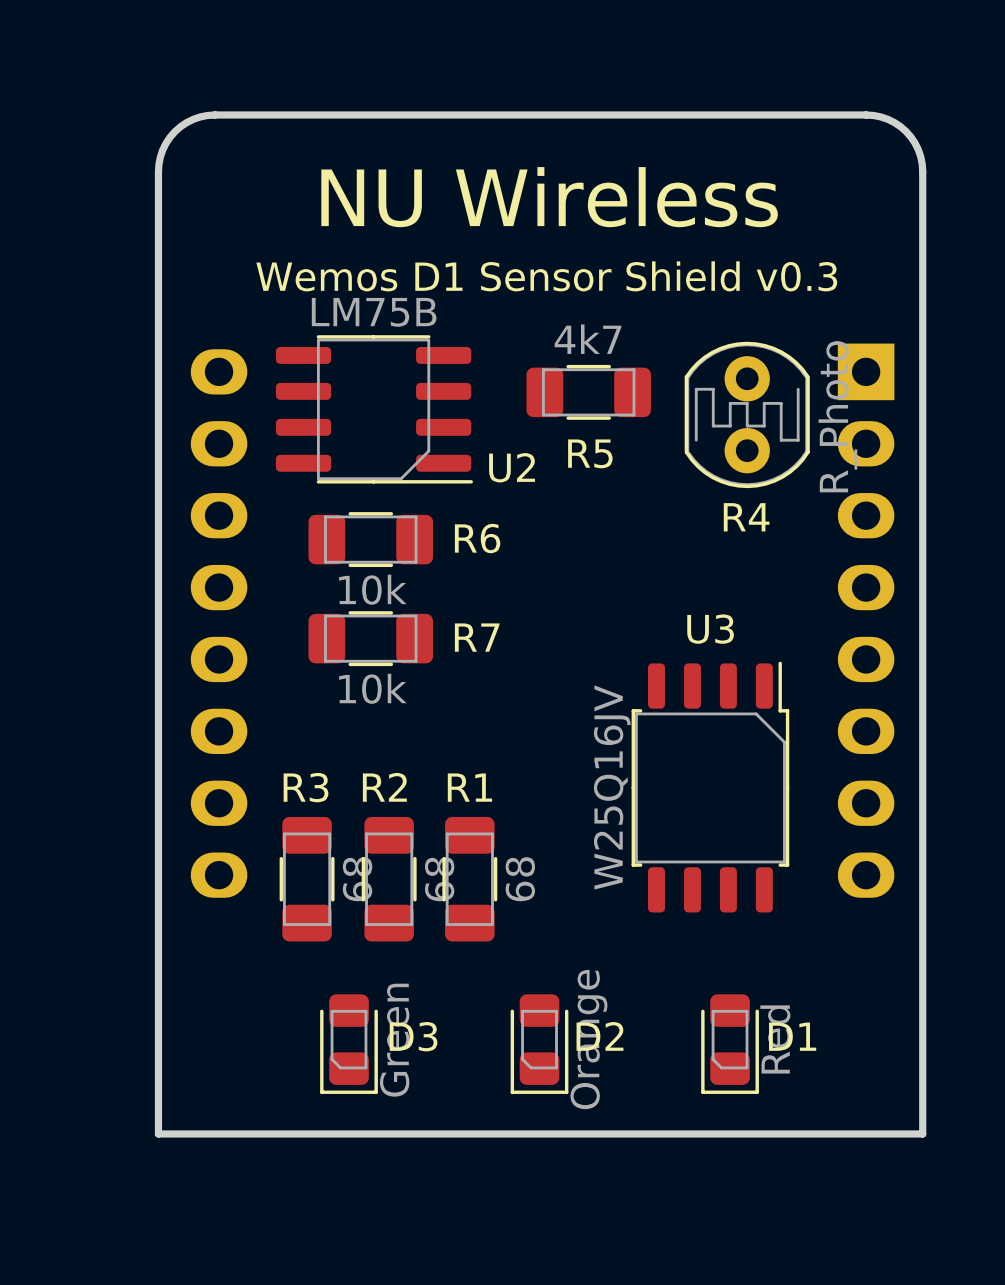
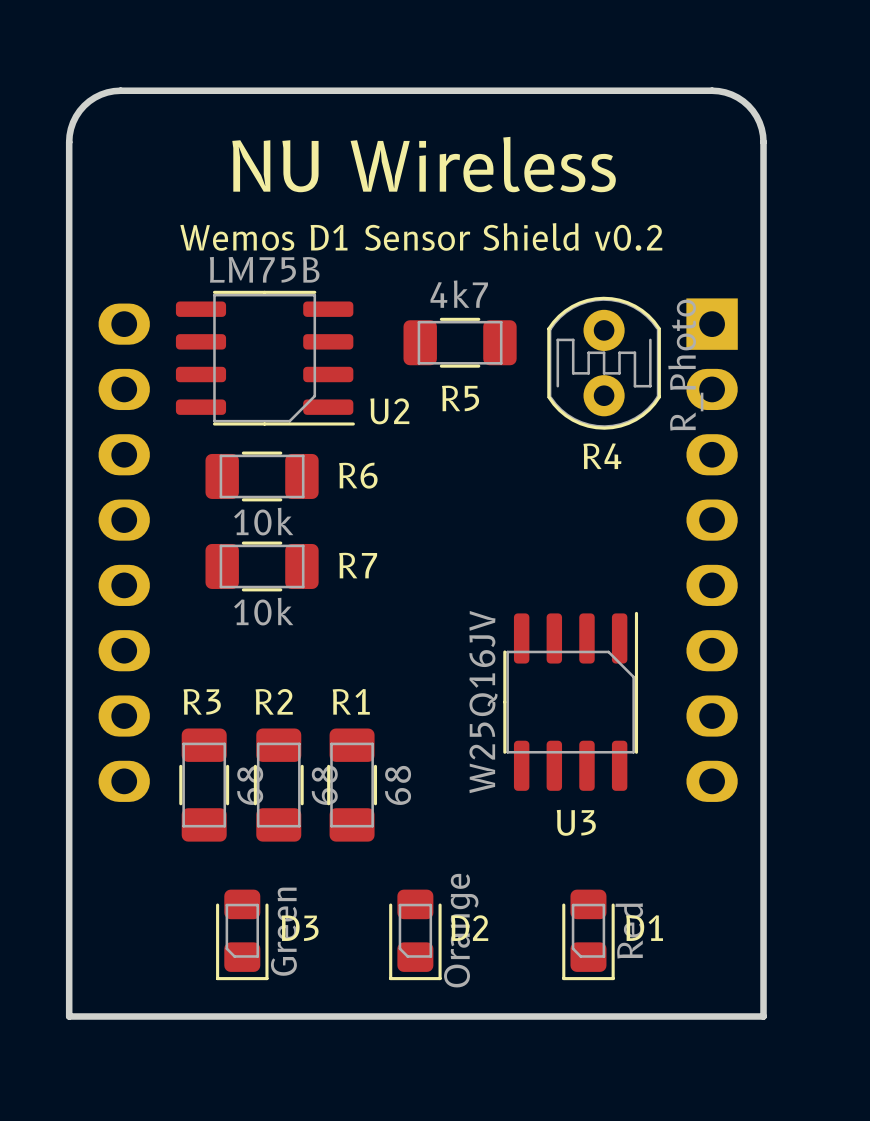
text: Wemos D1 Sensor Shield v0.3 (546, 276) -> Wemos D1 Sensor Shield v0.2 (421, 236)
U3 name position: U3 (710, 629) -> U3 (576, 822)
U3 footprint: [631, 661, 790, 913] -> [503, 611, 639, 791]

